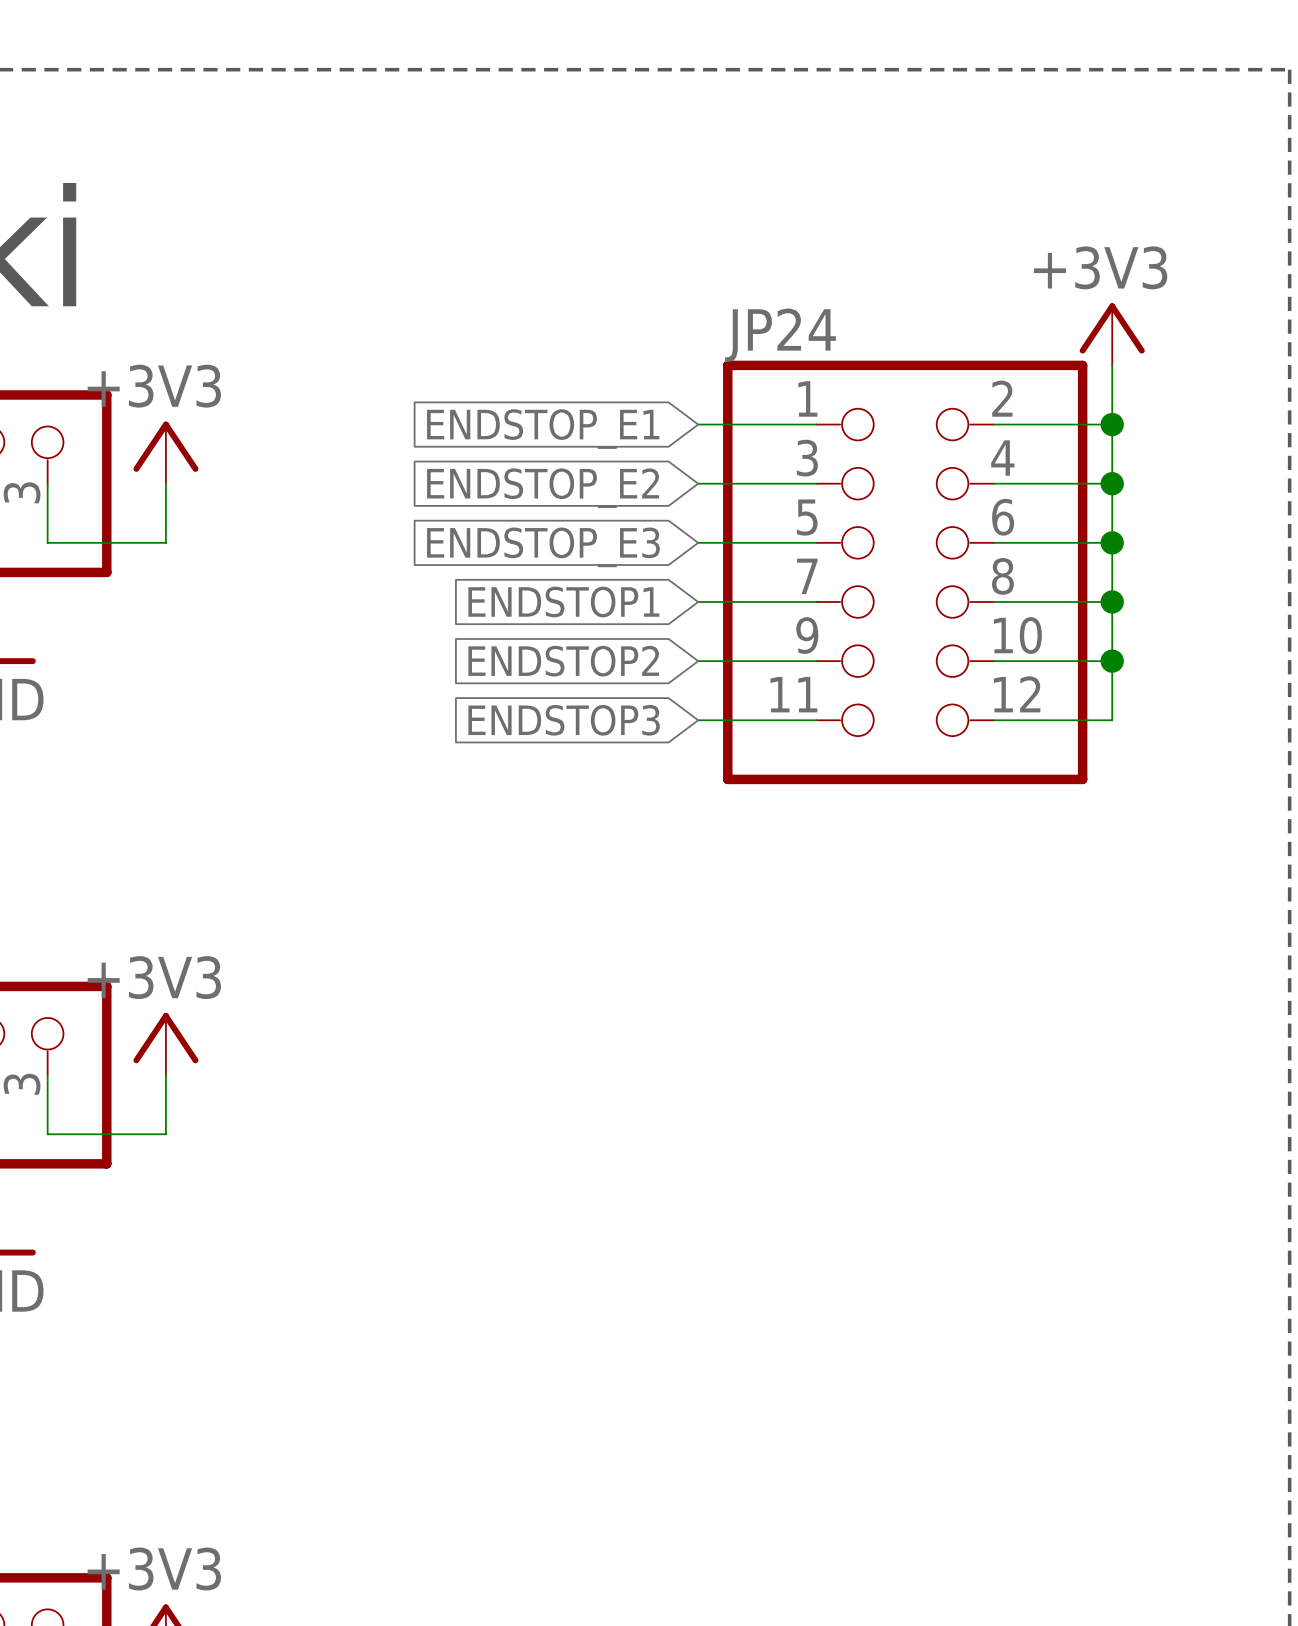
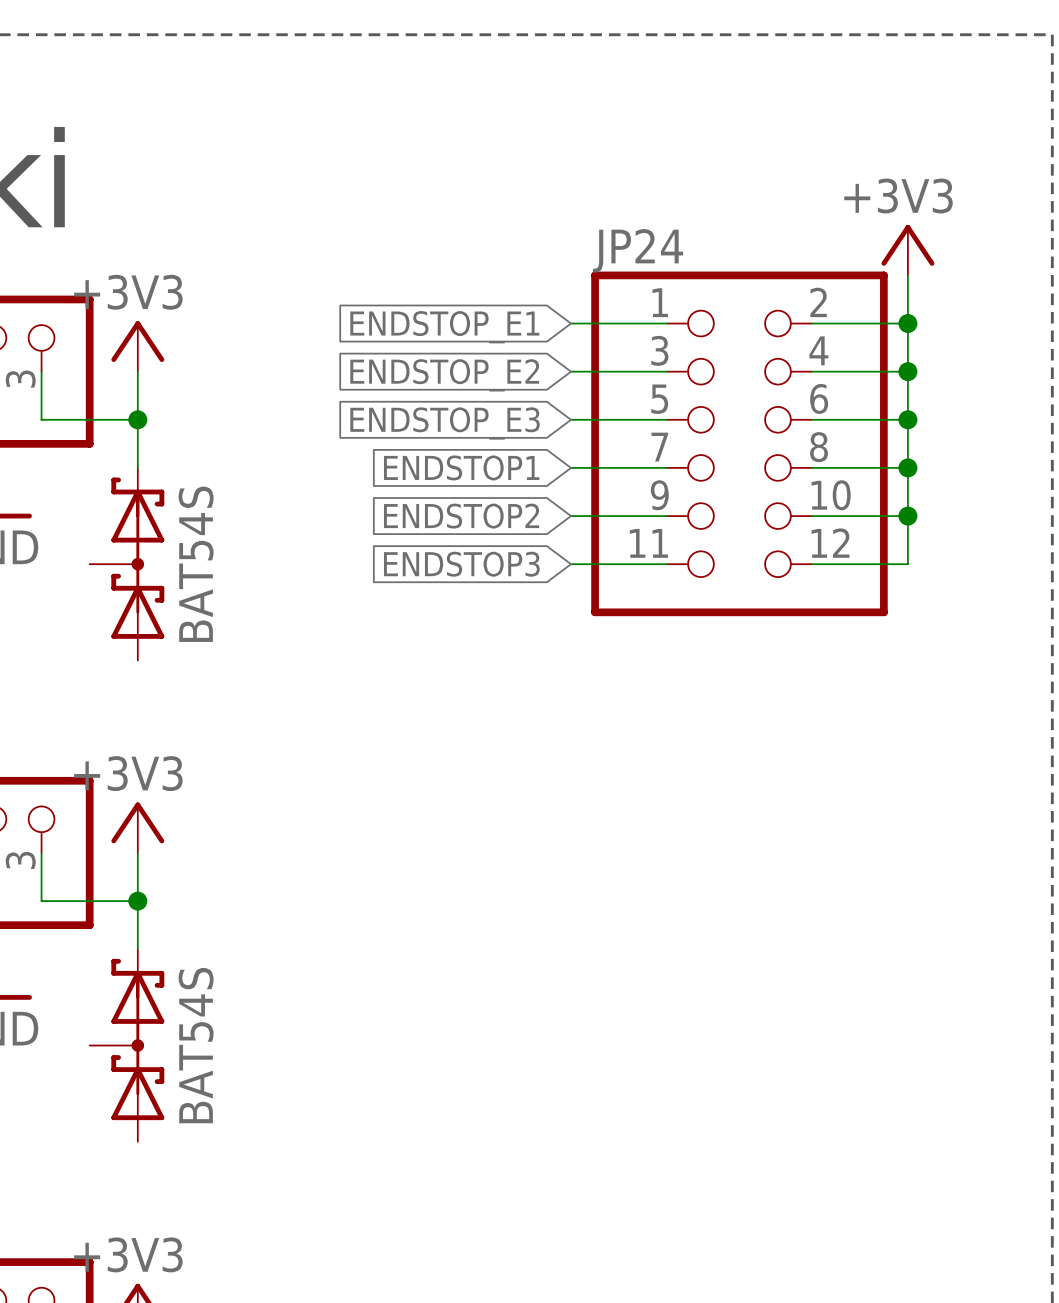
wire: none -> (137, 419) (137, 467)
junction: none -> (137, 419)
part: none -> BAT54S (126, 564)
wire: none -> (137, 901) (137, 949)
junction: none -> (137, 901)
part: none -> BAT54S (126, 1045)

